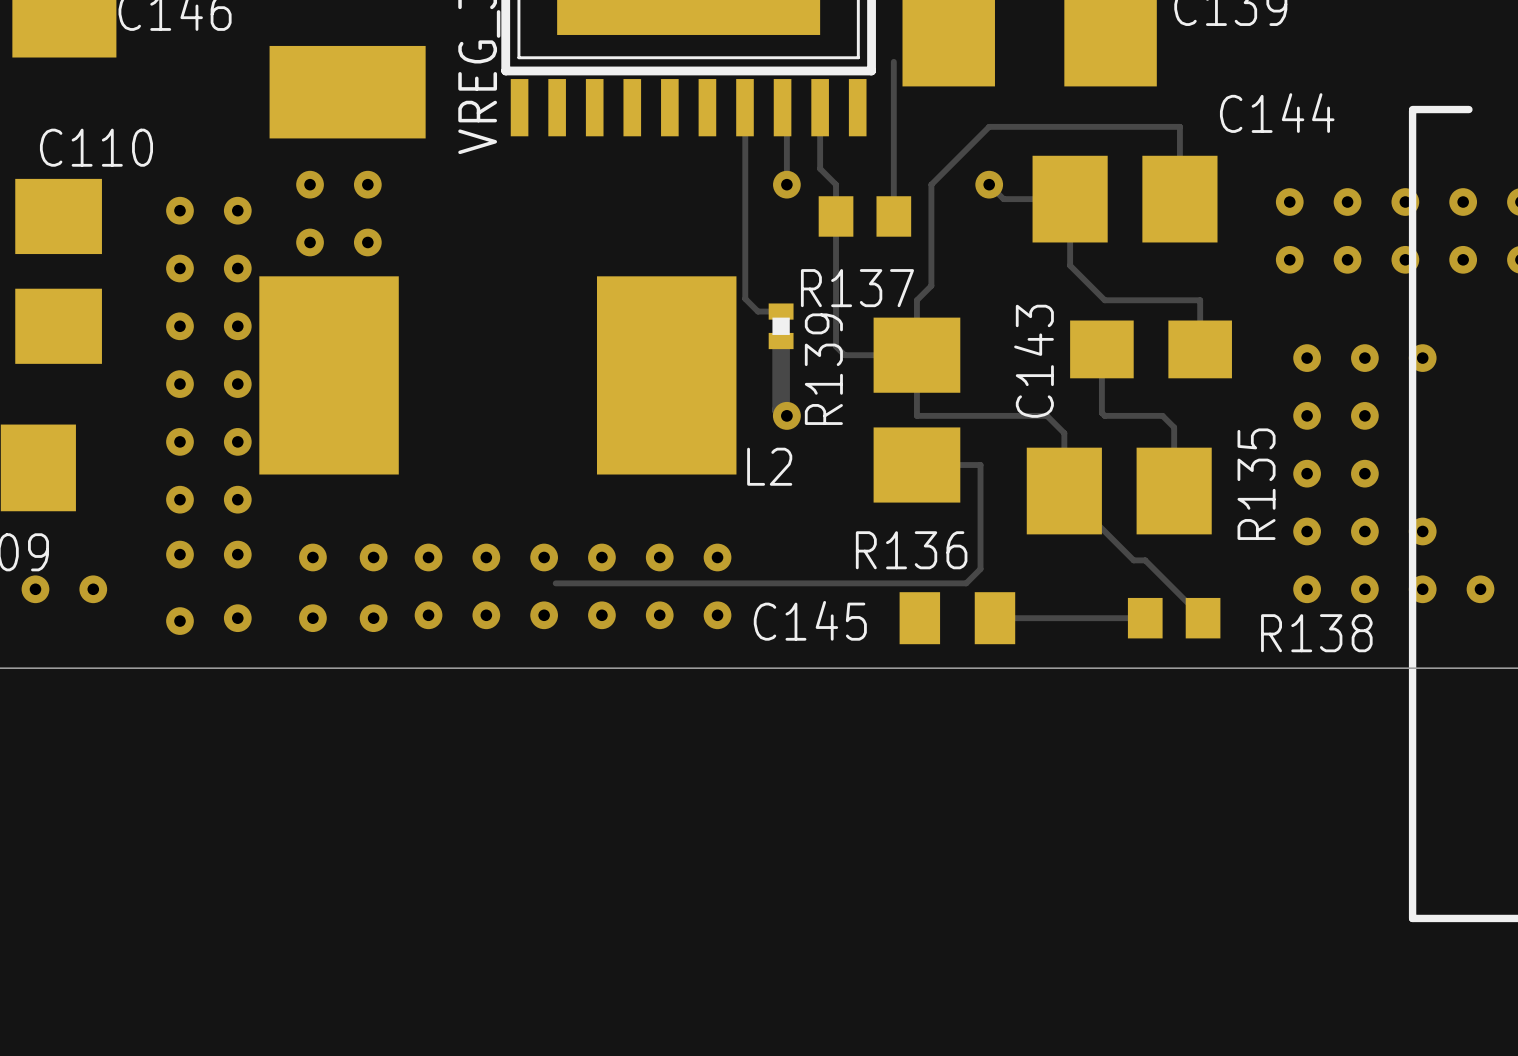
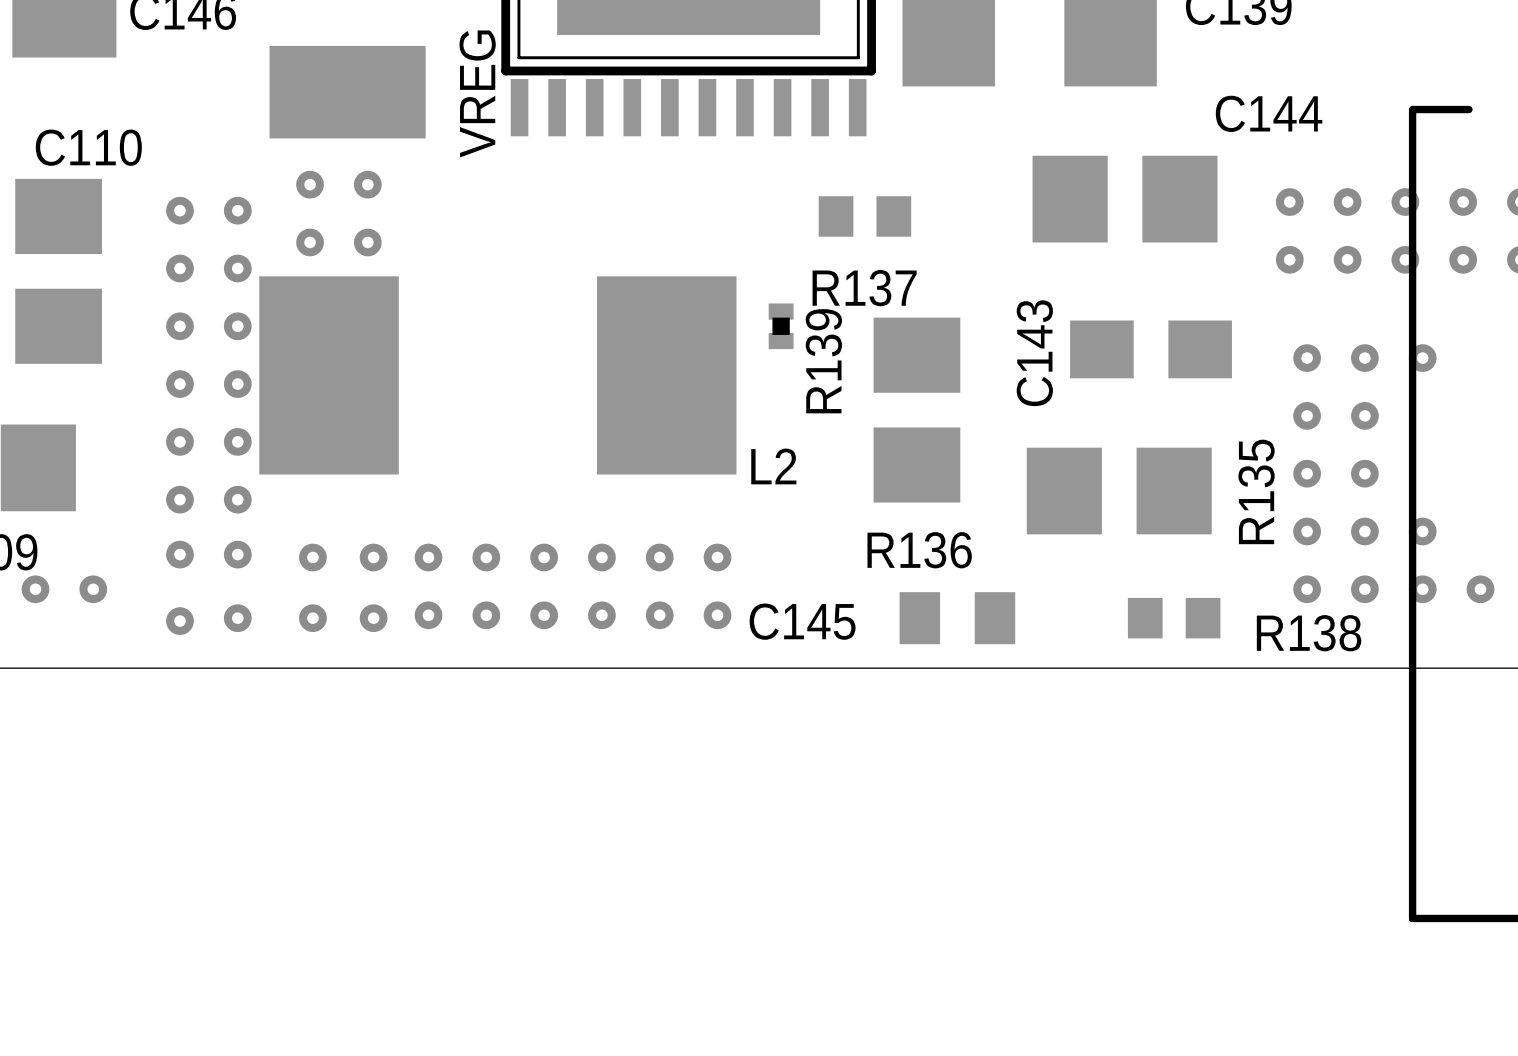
track: (893, 61) (893, 216) -> none
track: (745, 107) (745, 298) (757, 311) (781, 311) -> none
track: (782, 107) (782, 126) (786, 131) (786, 184) -> none
track: (820, 107) (820, 168) (836, 184) (836, 346) (844, 355) (916, 355) -> none
via: (786, 184) -> none
track: (989, 184) (1003, 199) (1070, 199) (1070, 265) (1104, 300) (1200, 300) (1200, 349) -> none
via: (989, 184) -> none
track: (1179, 199) (1179, 126) (989, 126) (931, 184) (931, 285) (916, 300) (916, 415) (1047, 415) (1064, 433) (1064, 491) (1133, 560) (1145, 560) (1203, 618) -> none
track: (781, 341) (781, 410) (786, 415) -> none
track: (1101, 349) (1101, 412) (1104, 415) (1162, 415) (1174, 427) (1174, 491) -> none
via: (786, 415) -> none
track: (916, 465) (980, 465) (980, 569) (966, 583) (555, 583) -> none
track: (994, 618) (1145, 618) -> none

